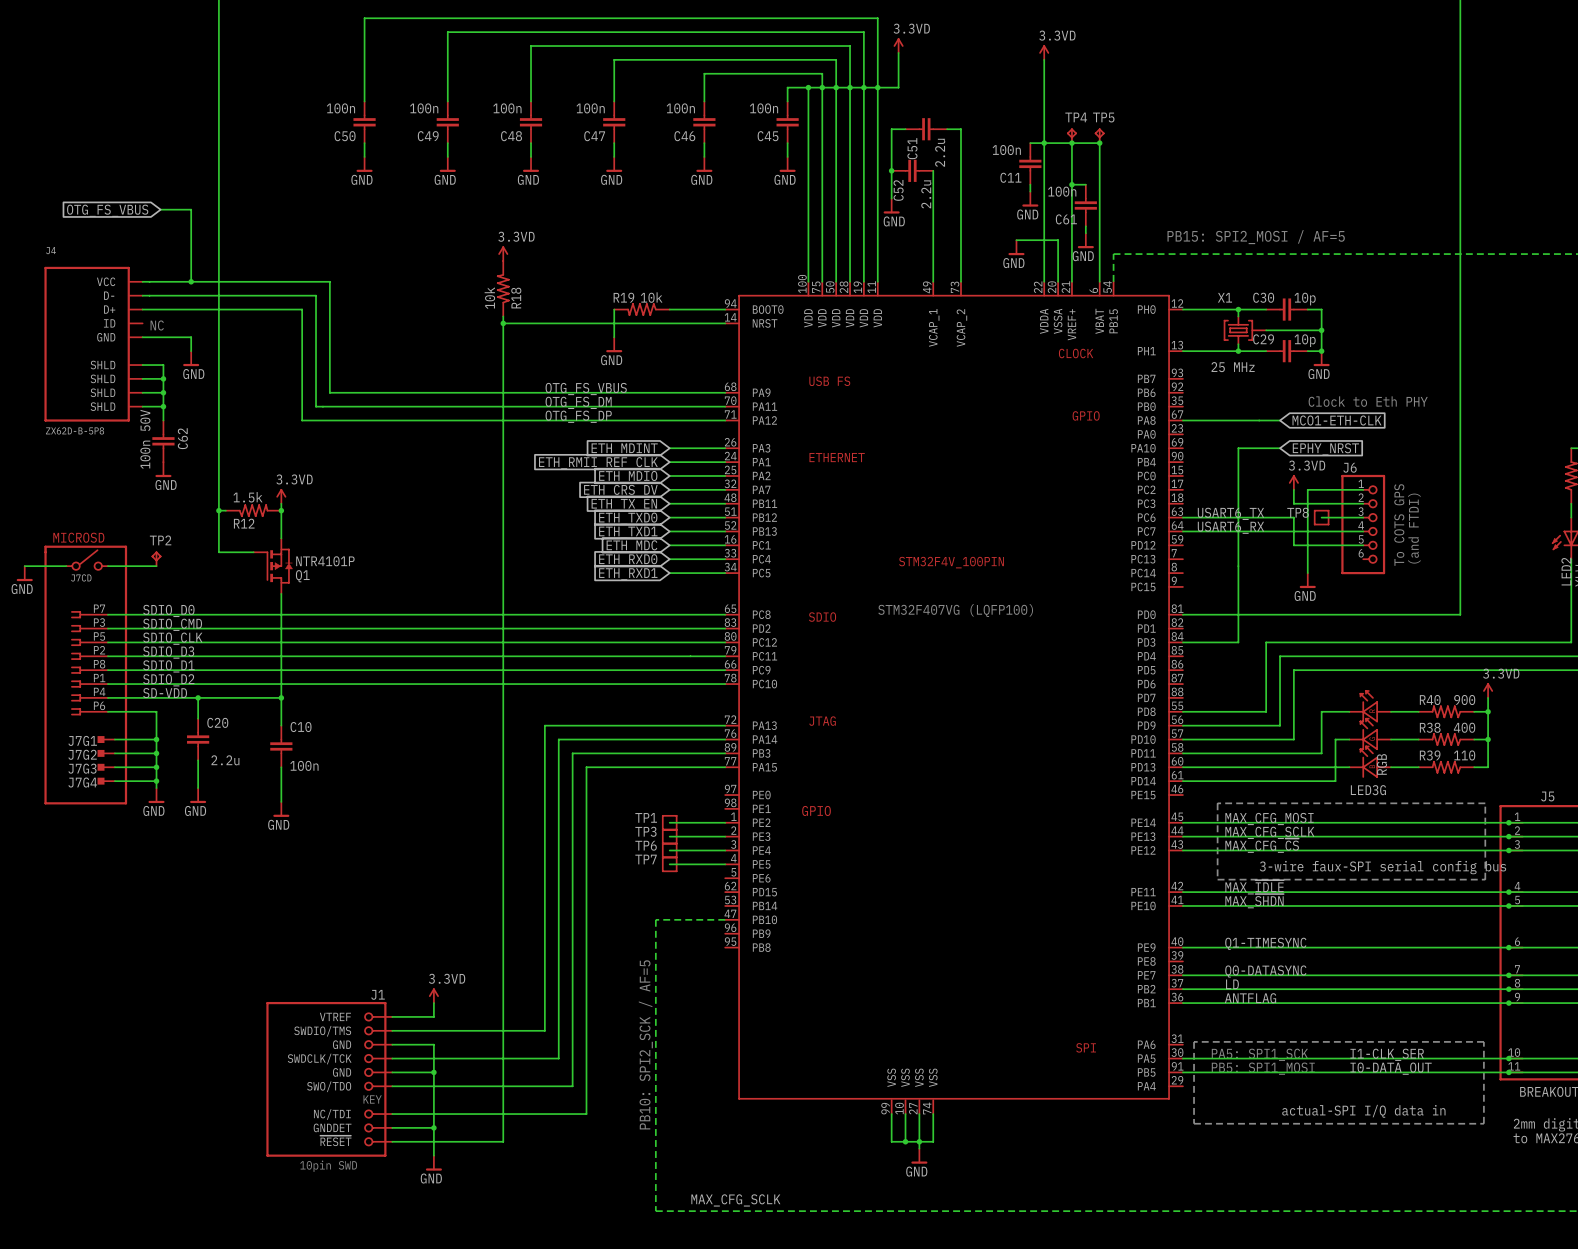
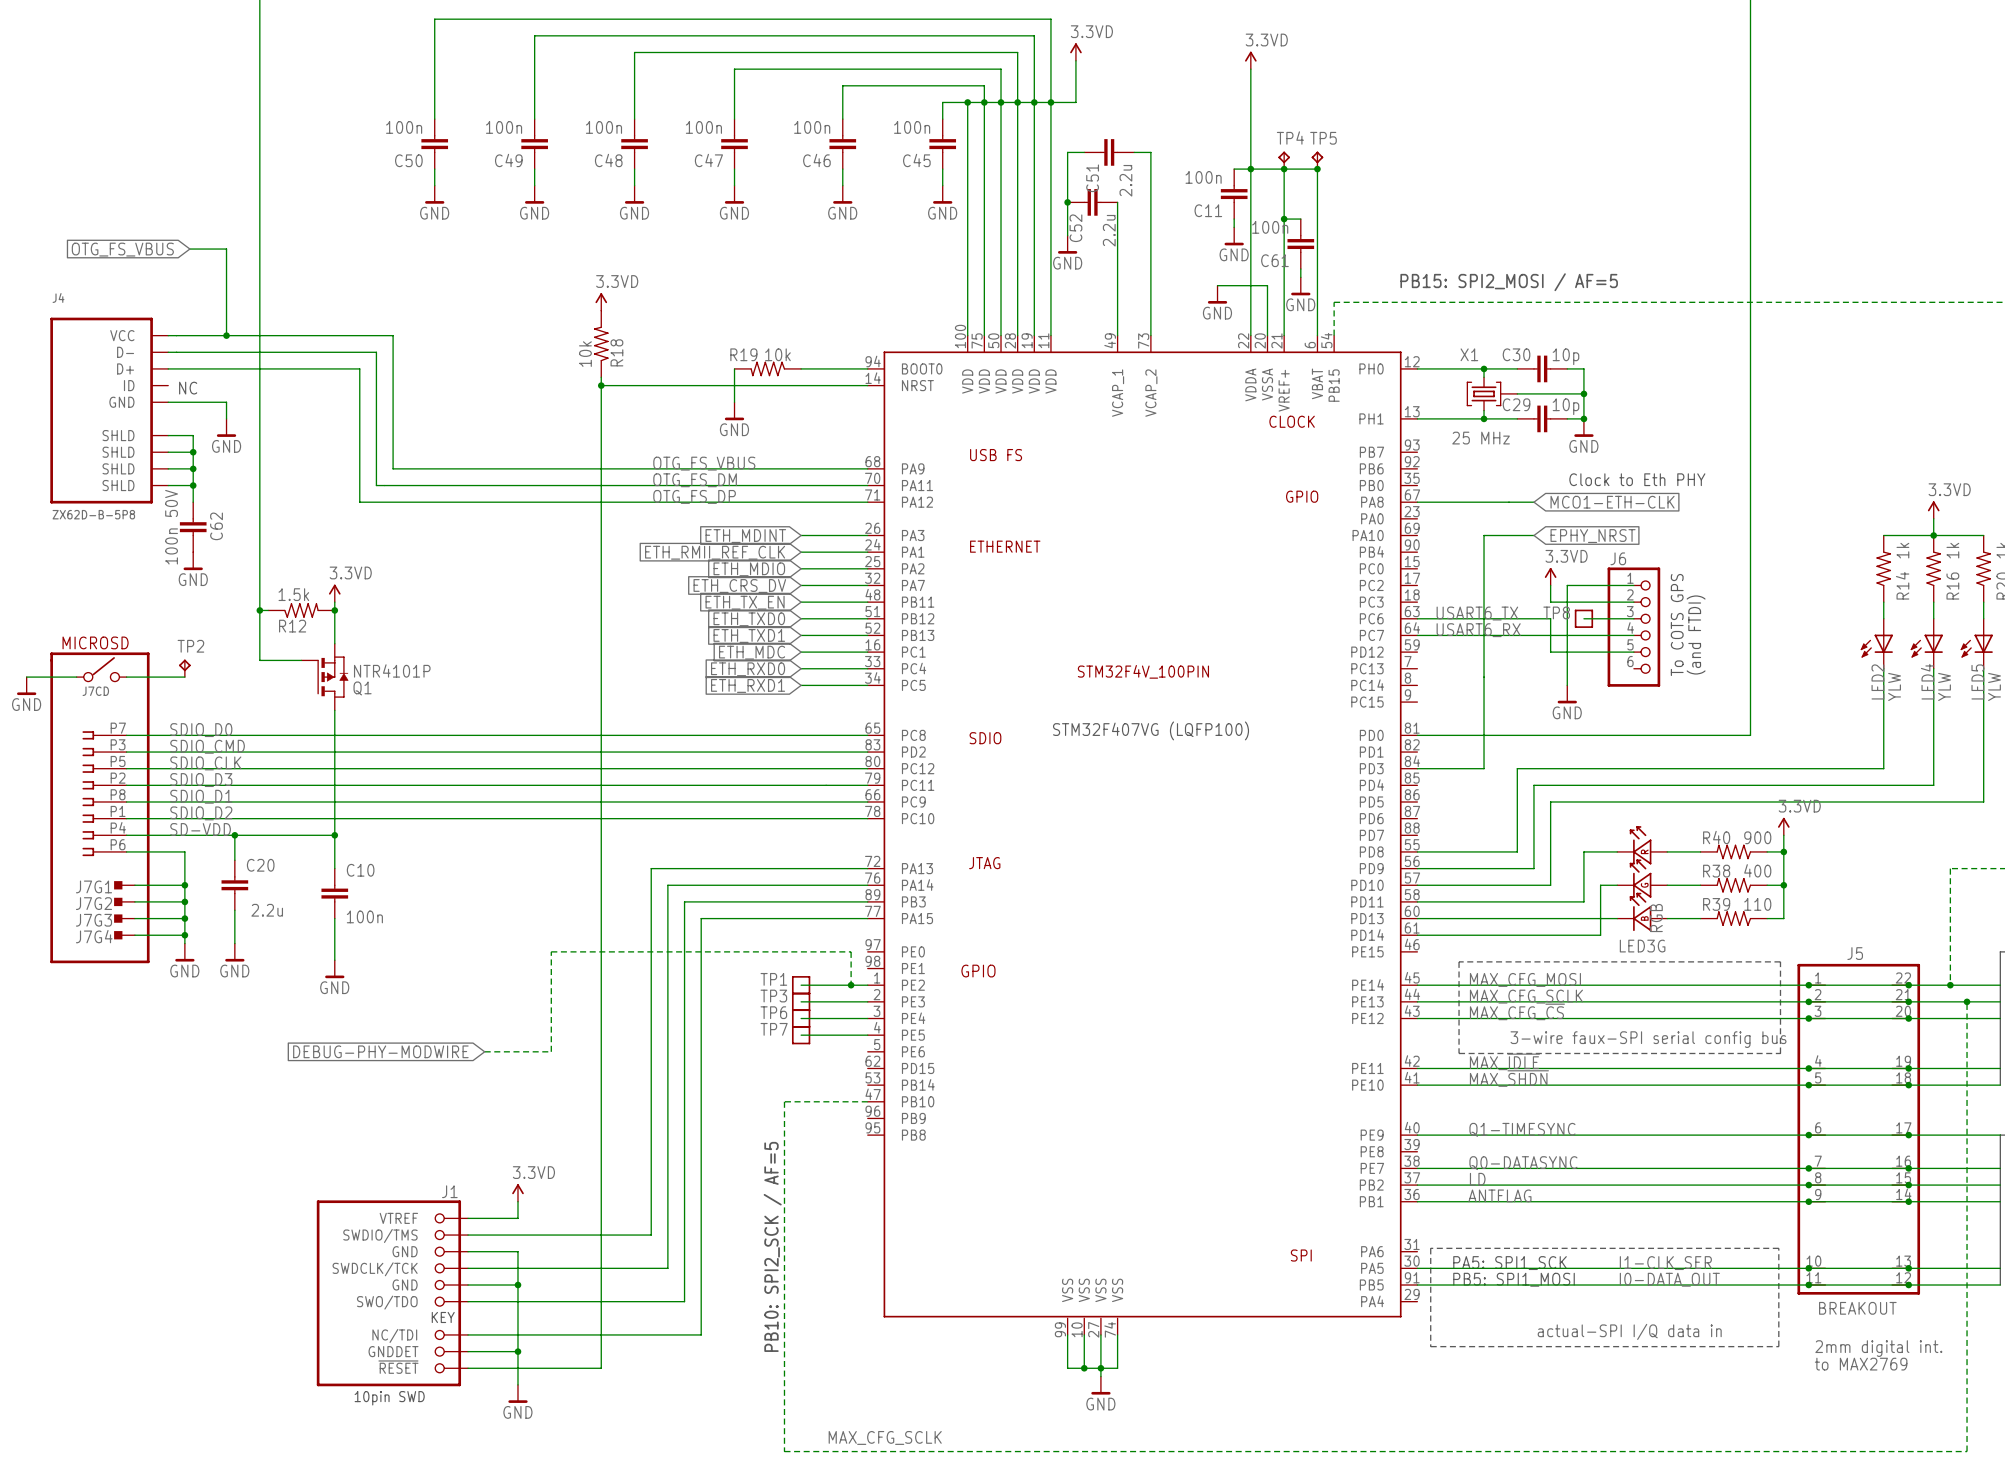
wire: none -> (851, 985) (851, 951) (551, 951) (551, 1051) (484, 1051)
junction: none -> (851, 985)
global label: none -> DEBUG-PHY-MODWIRE (380, 1051)

